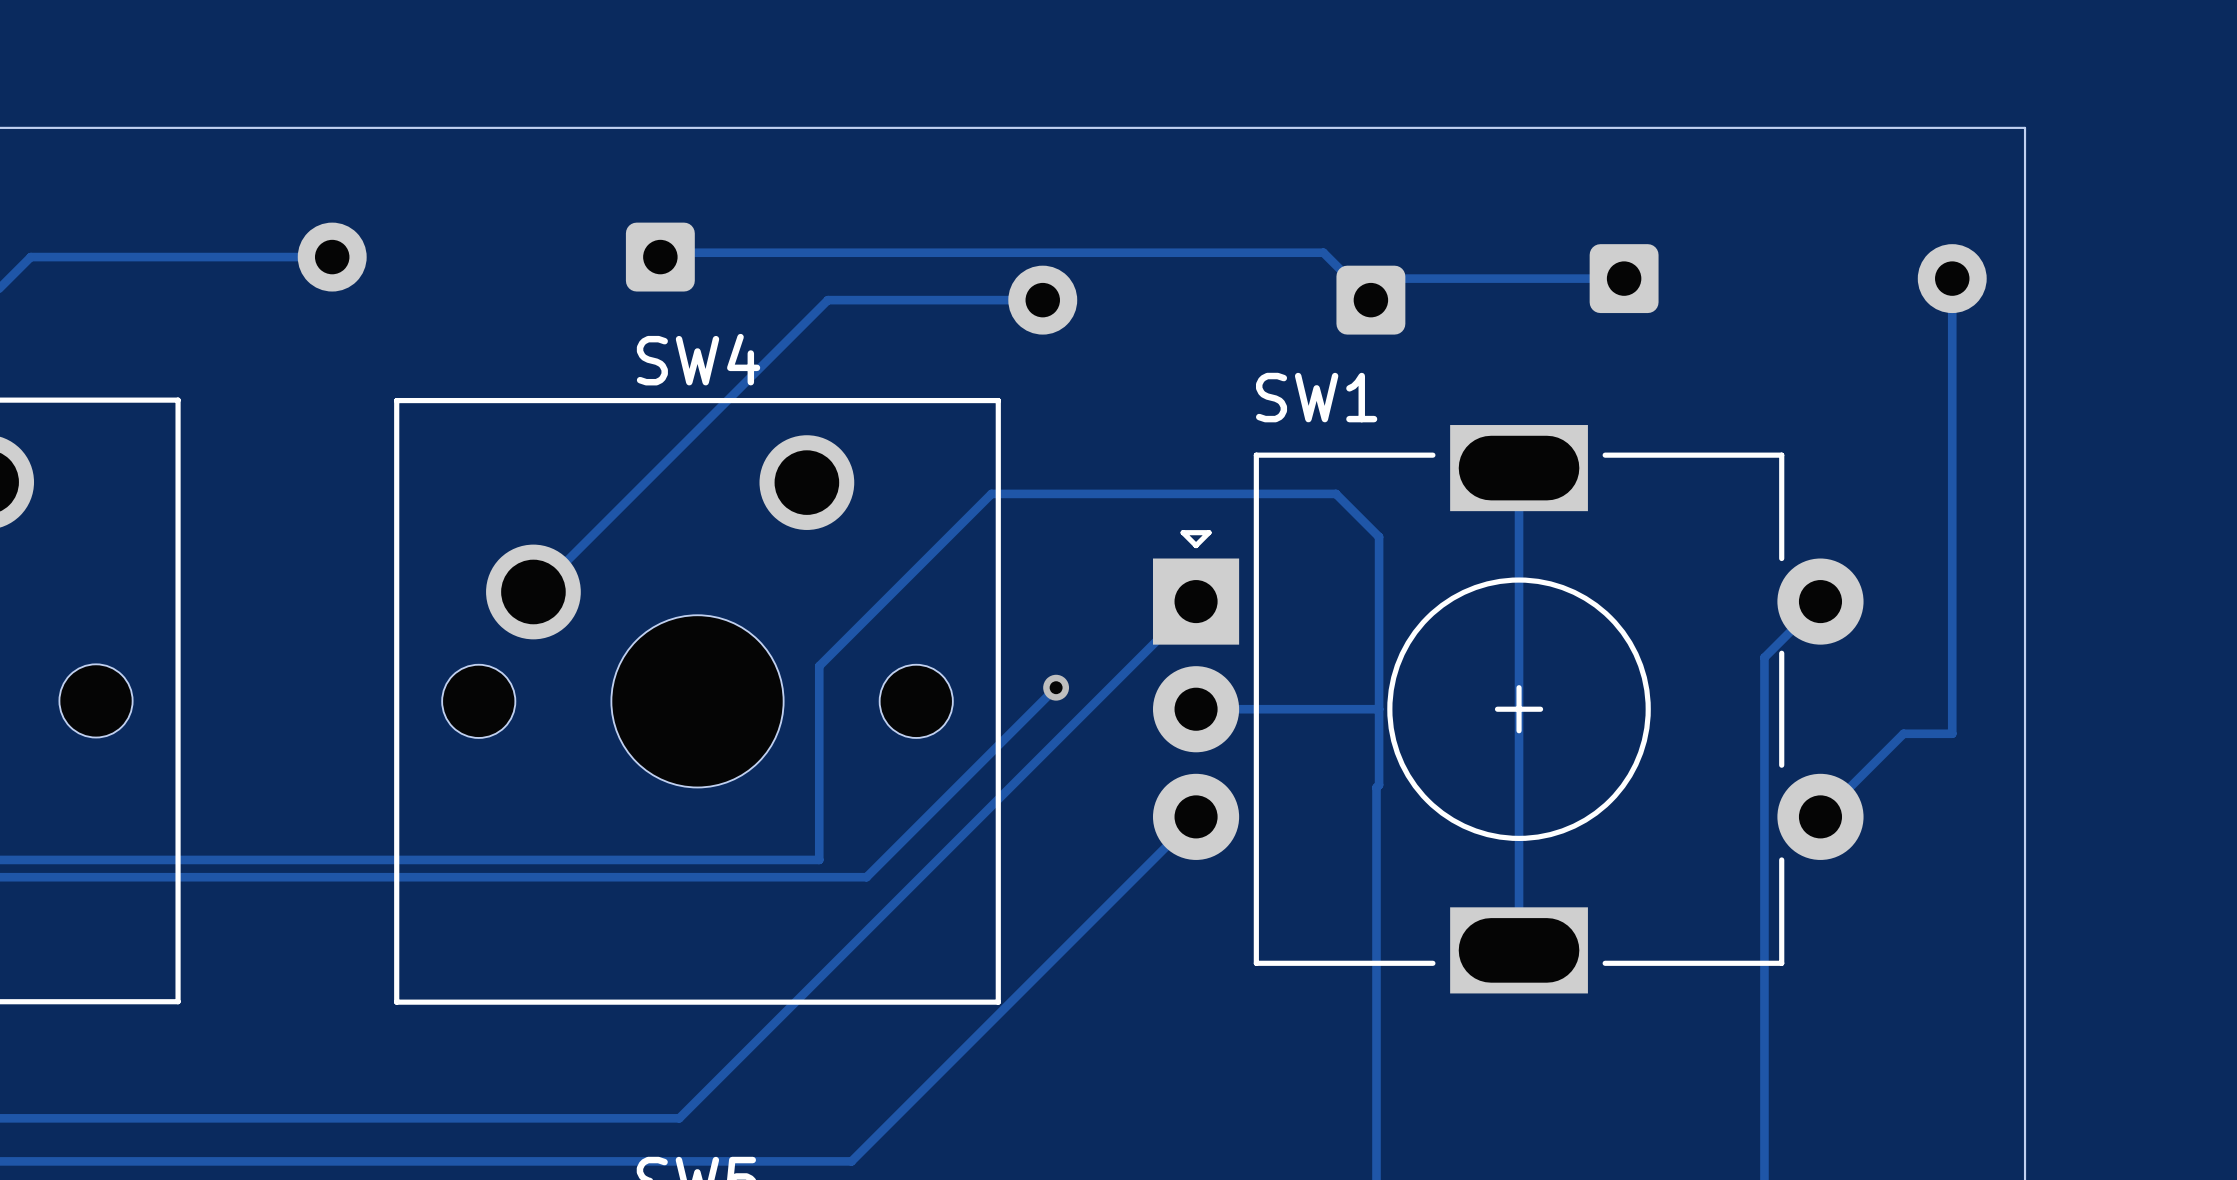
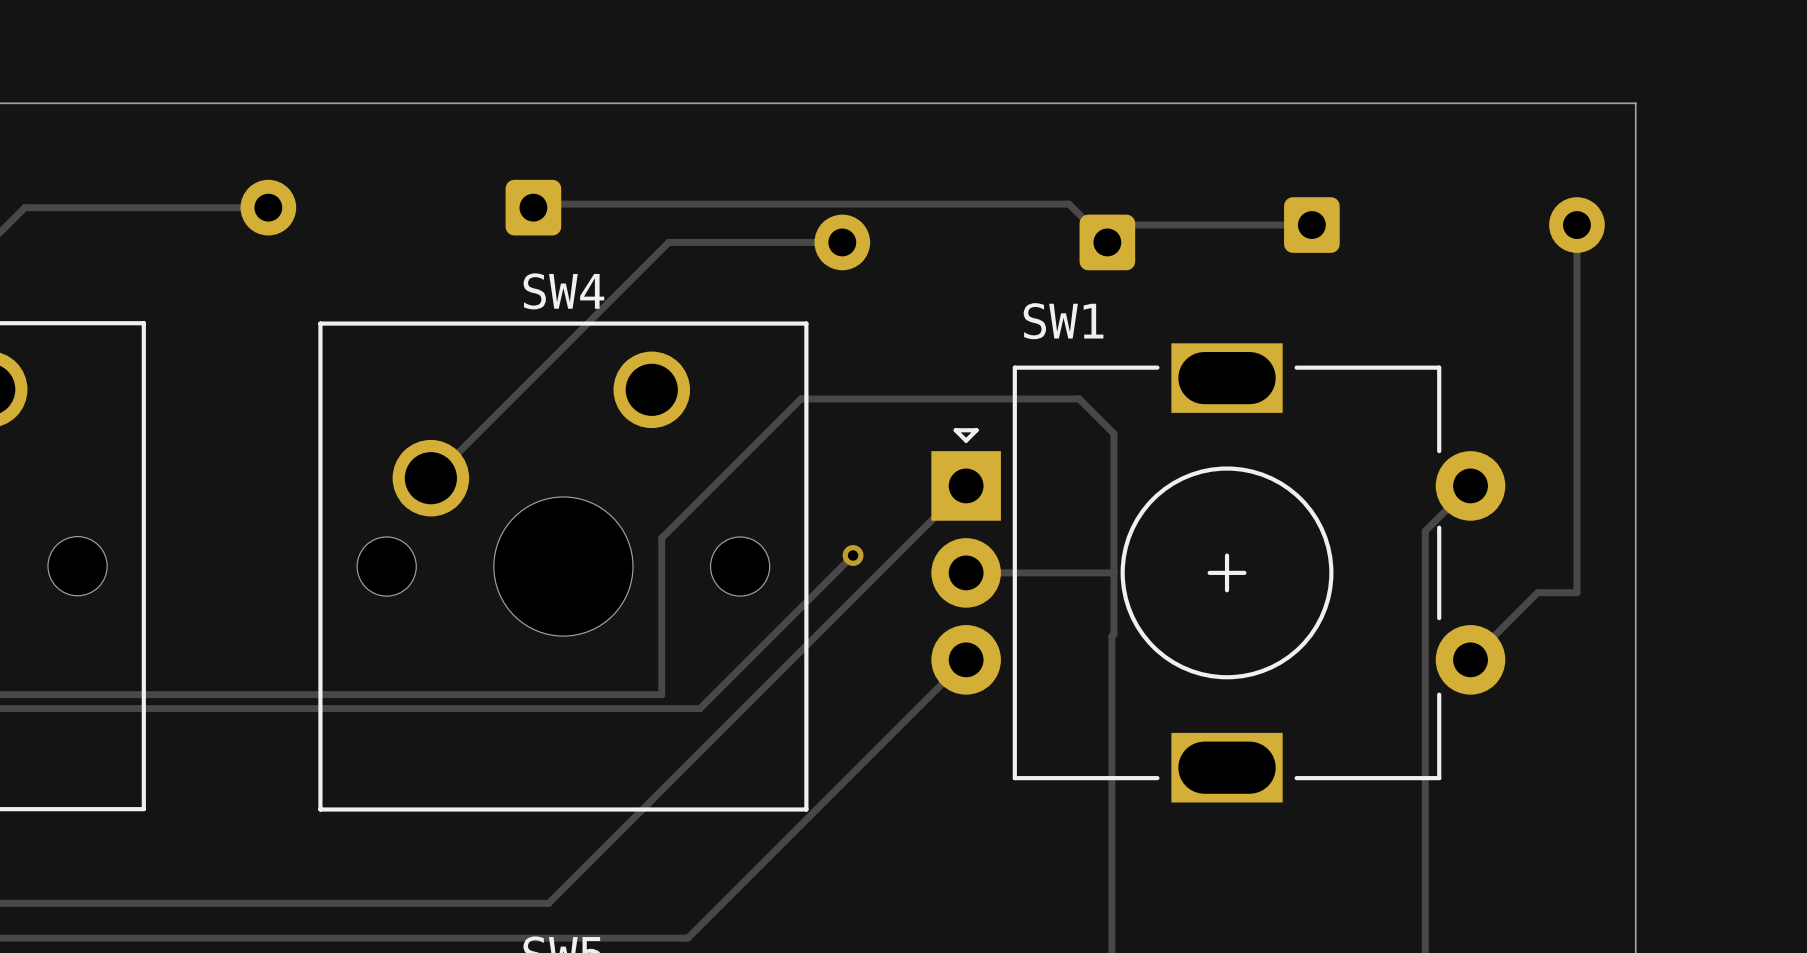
track: (1519, 468) (1519, 950) -> none

